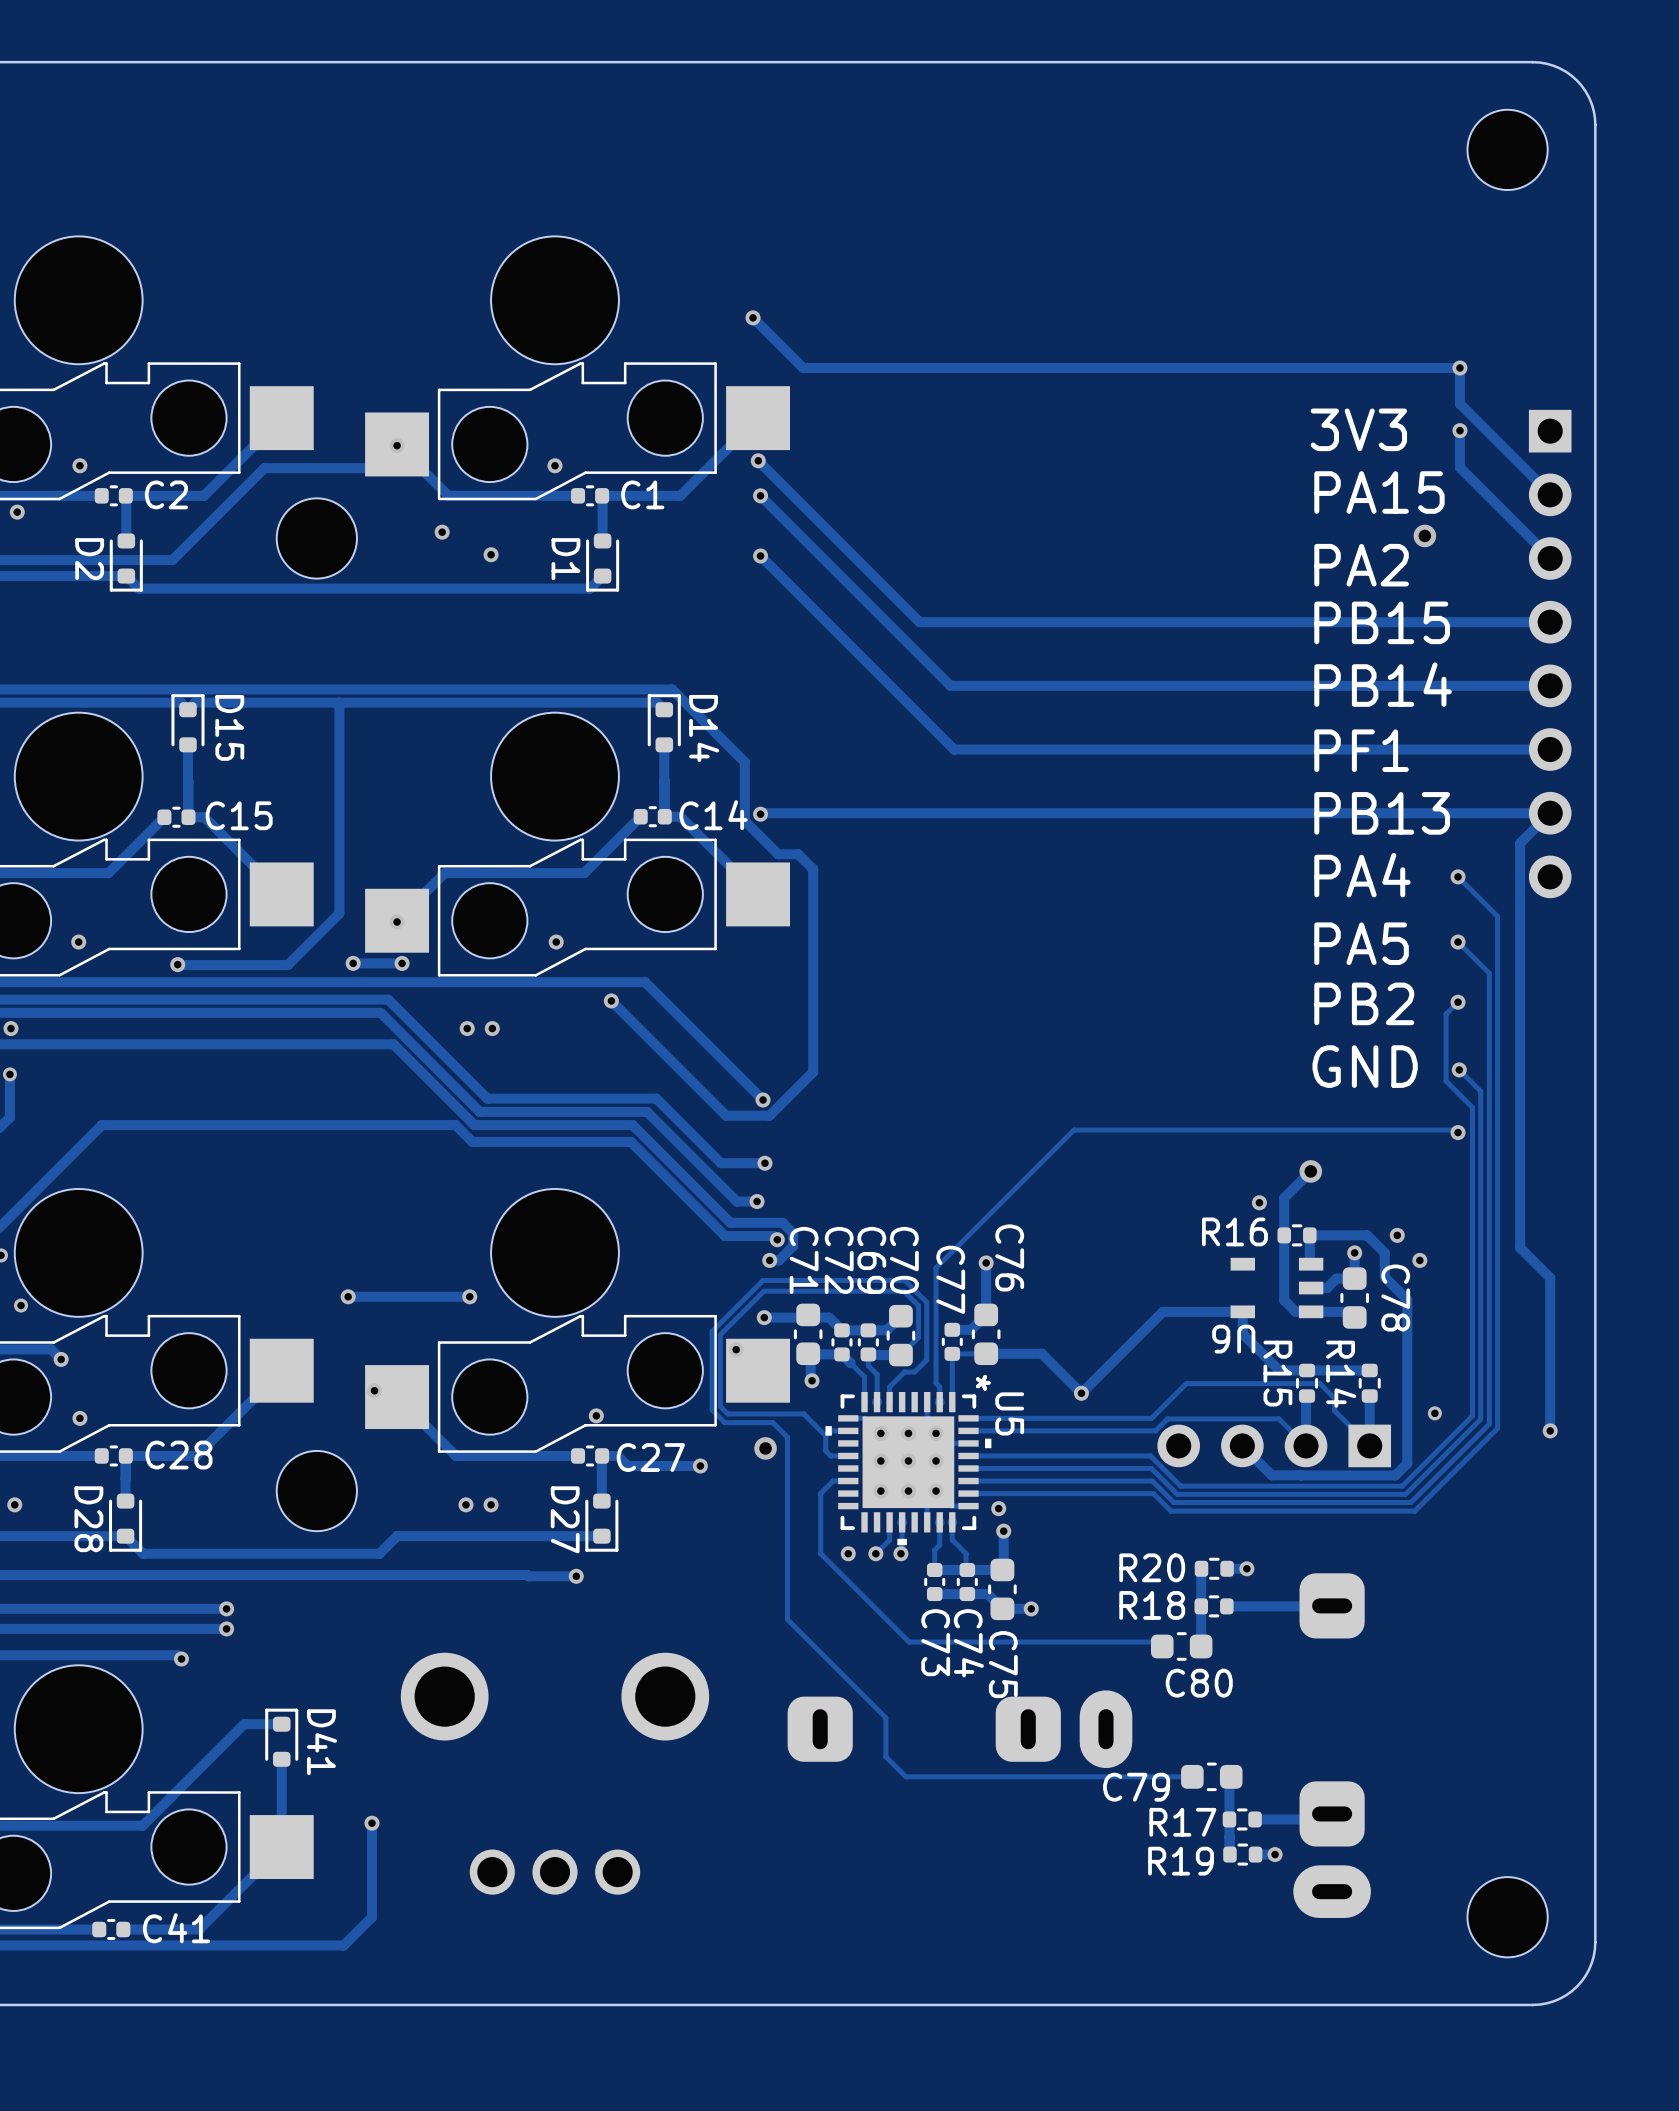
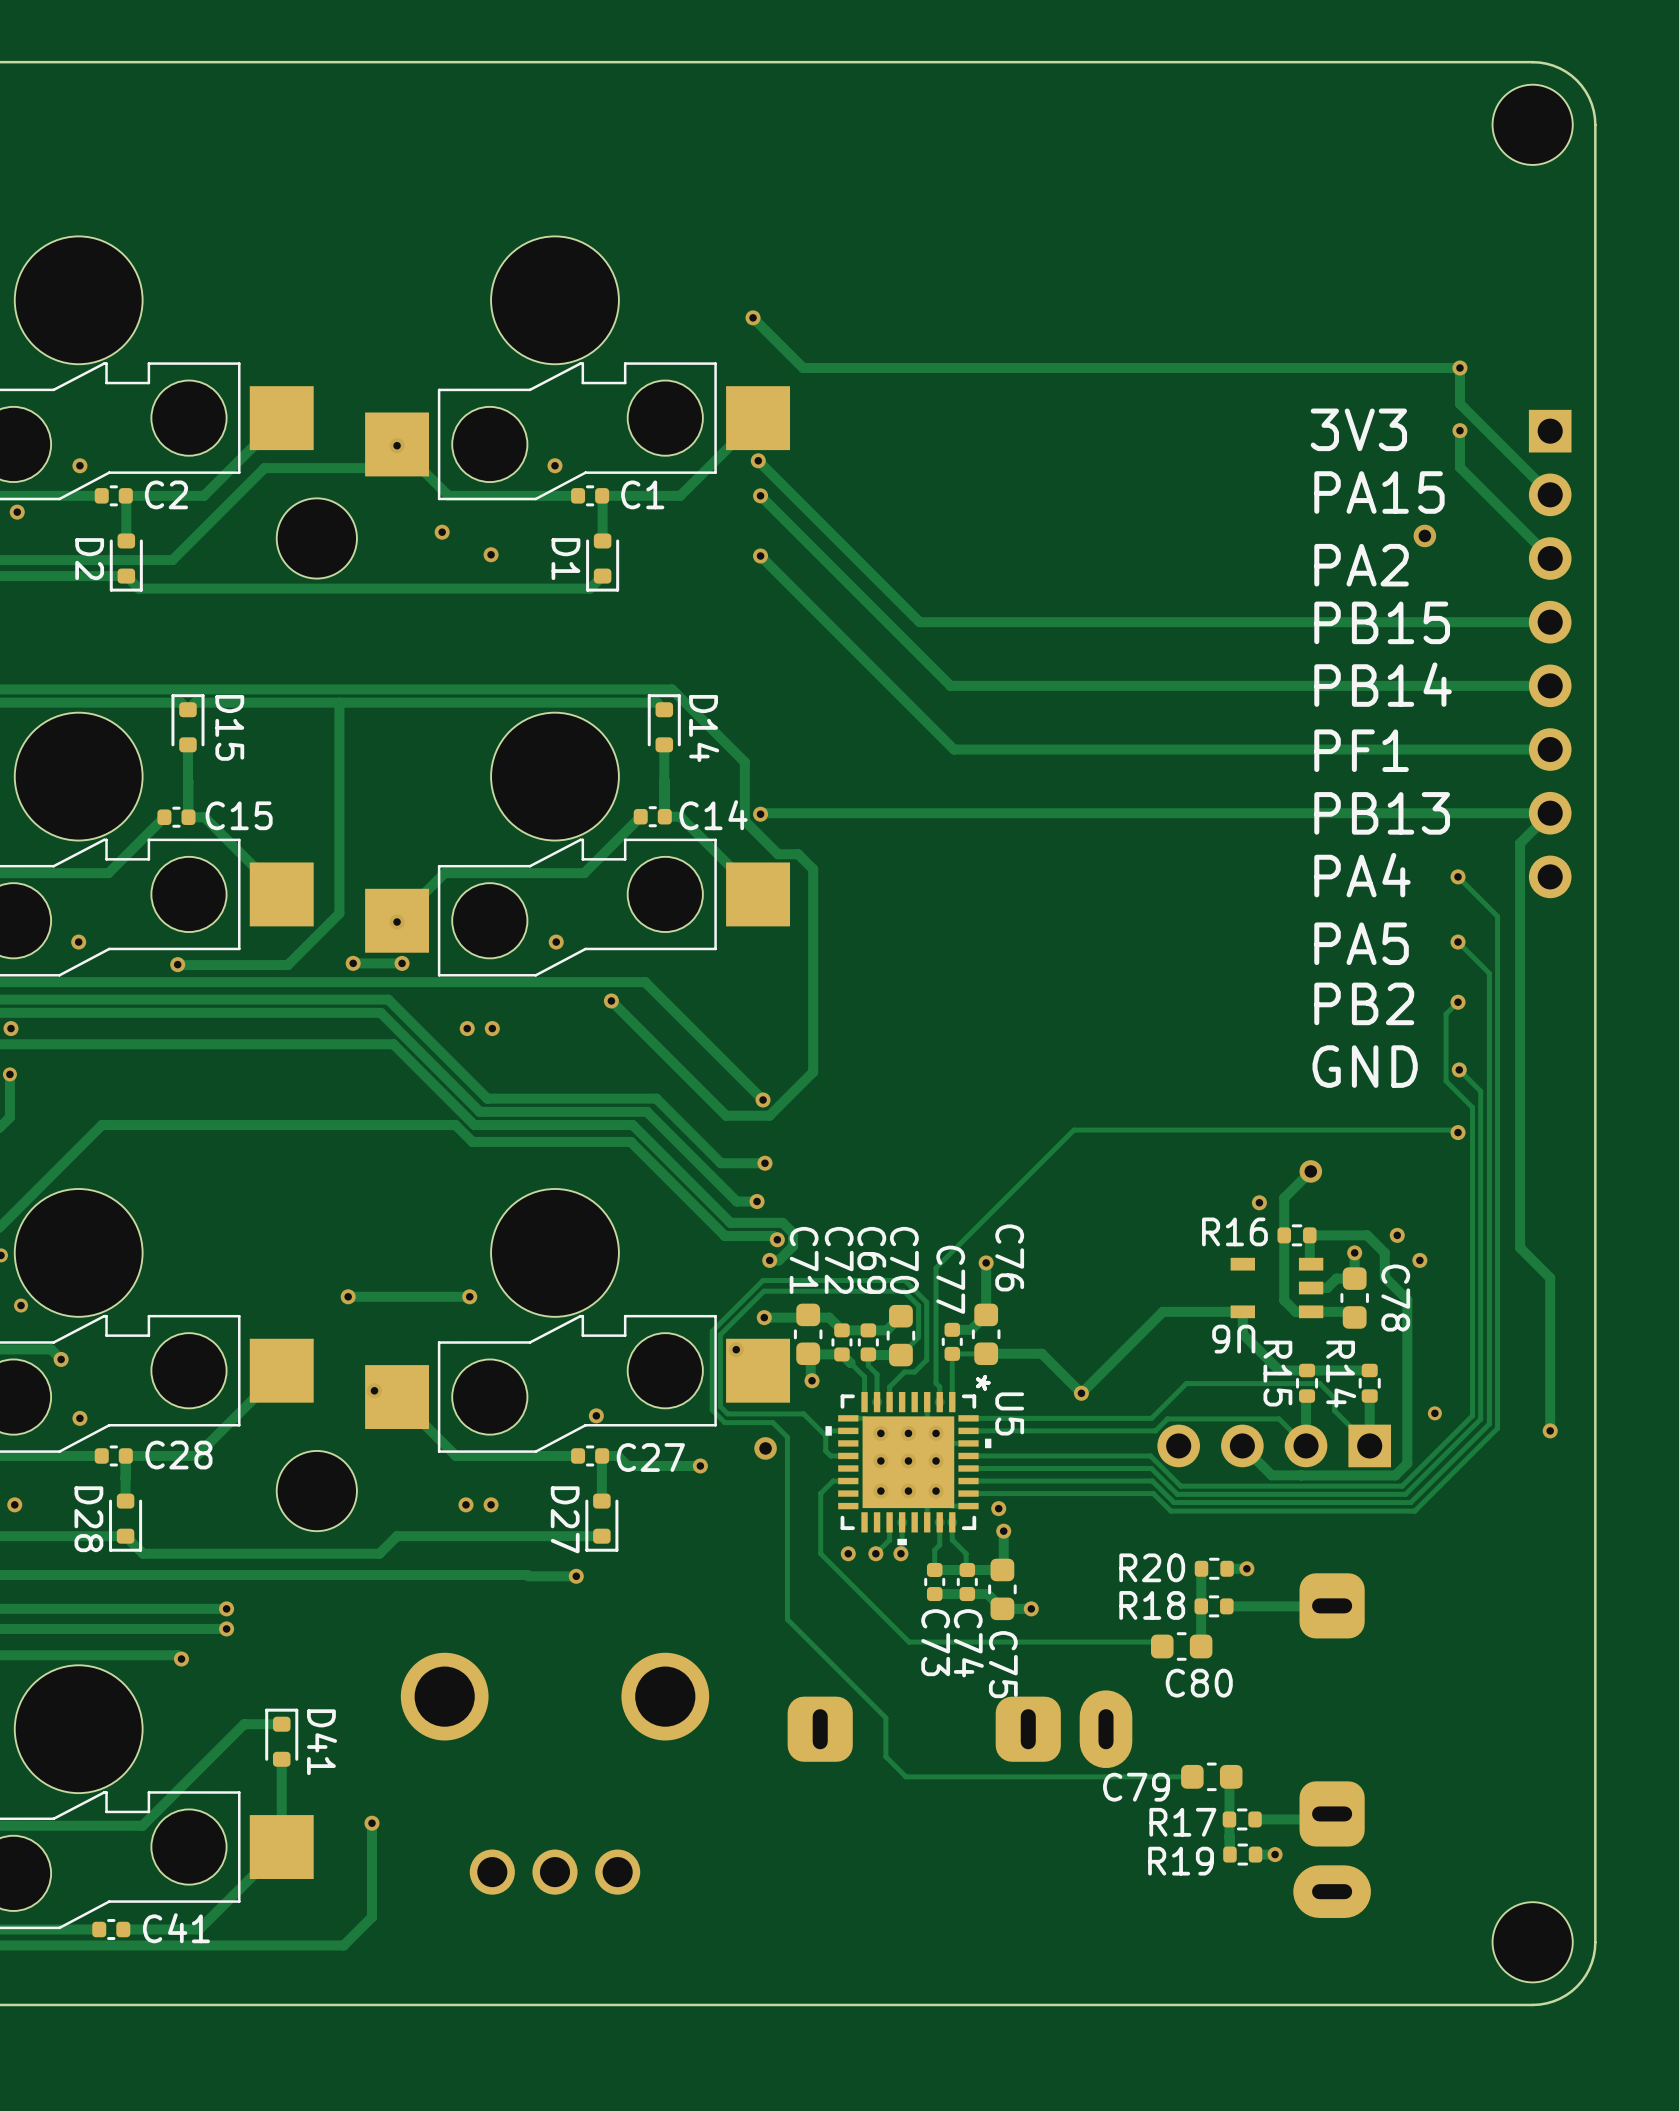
part position: (1507, 149) -> (1532, 124)
part position: (1507, 1917) -> (1532, 1942)

